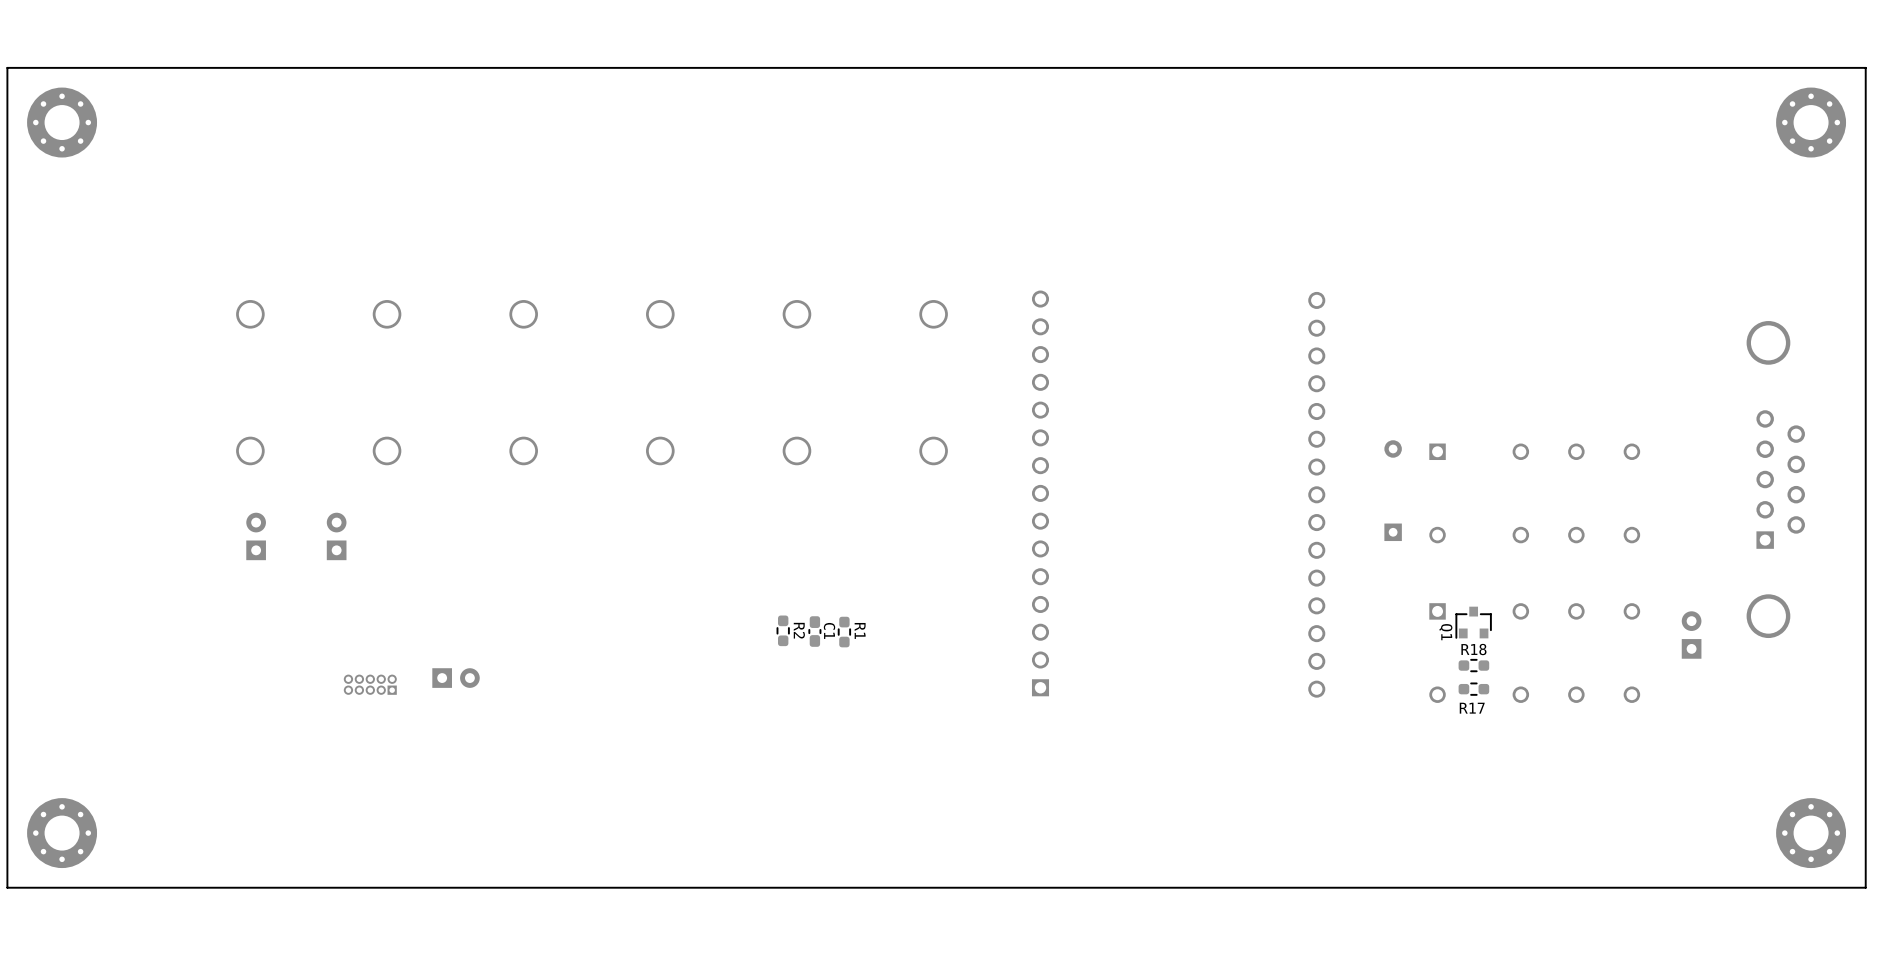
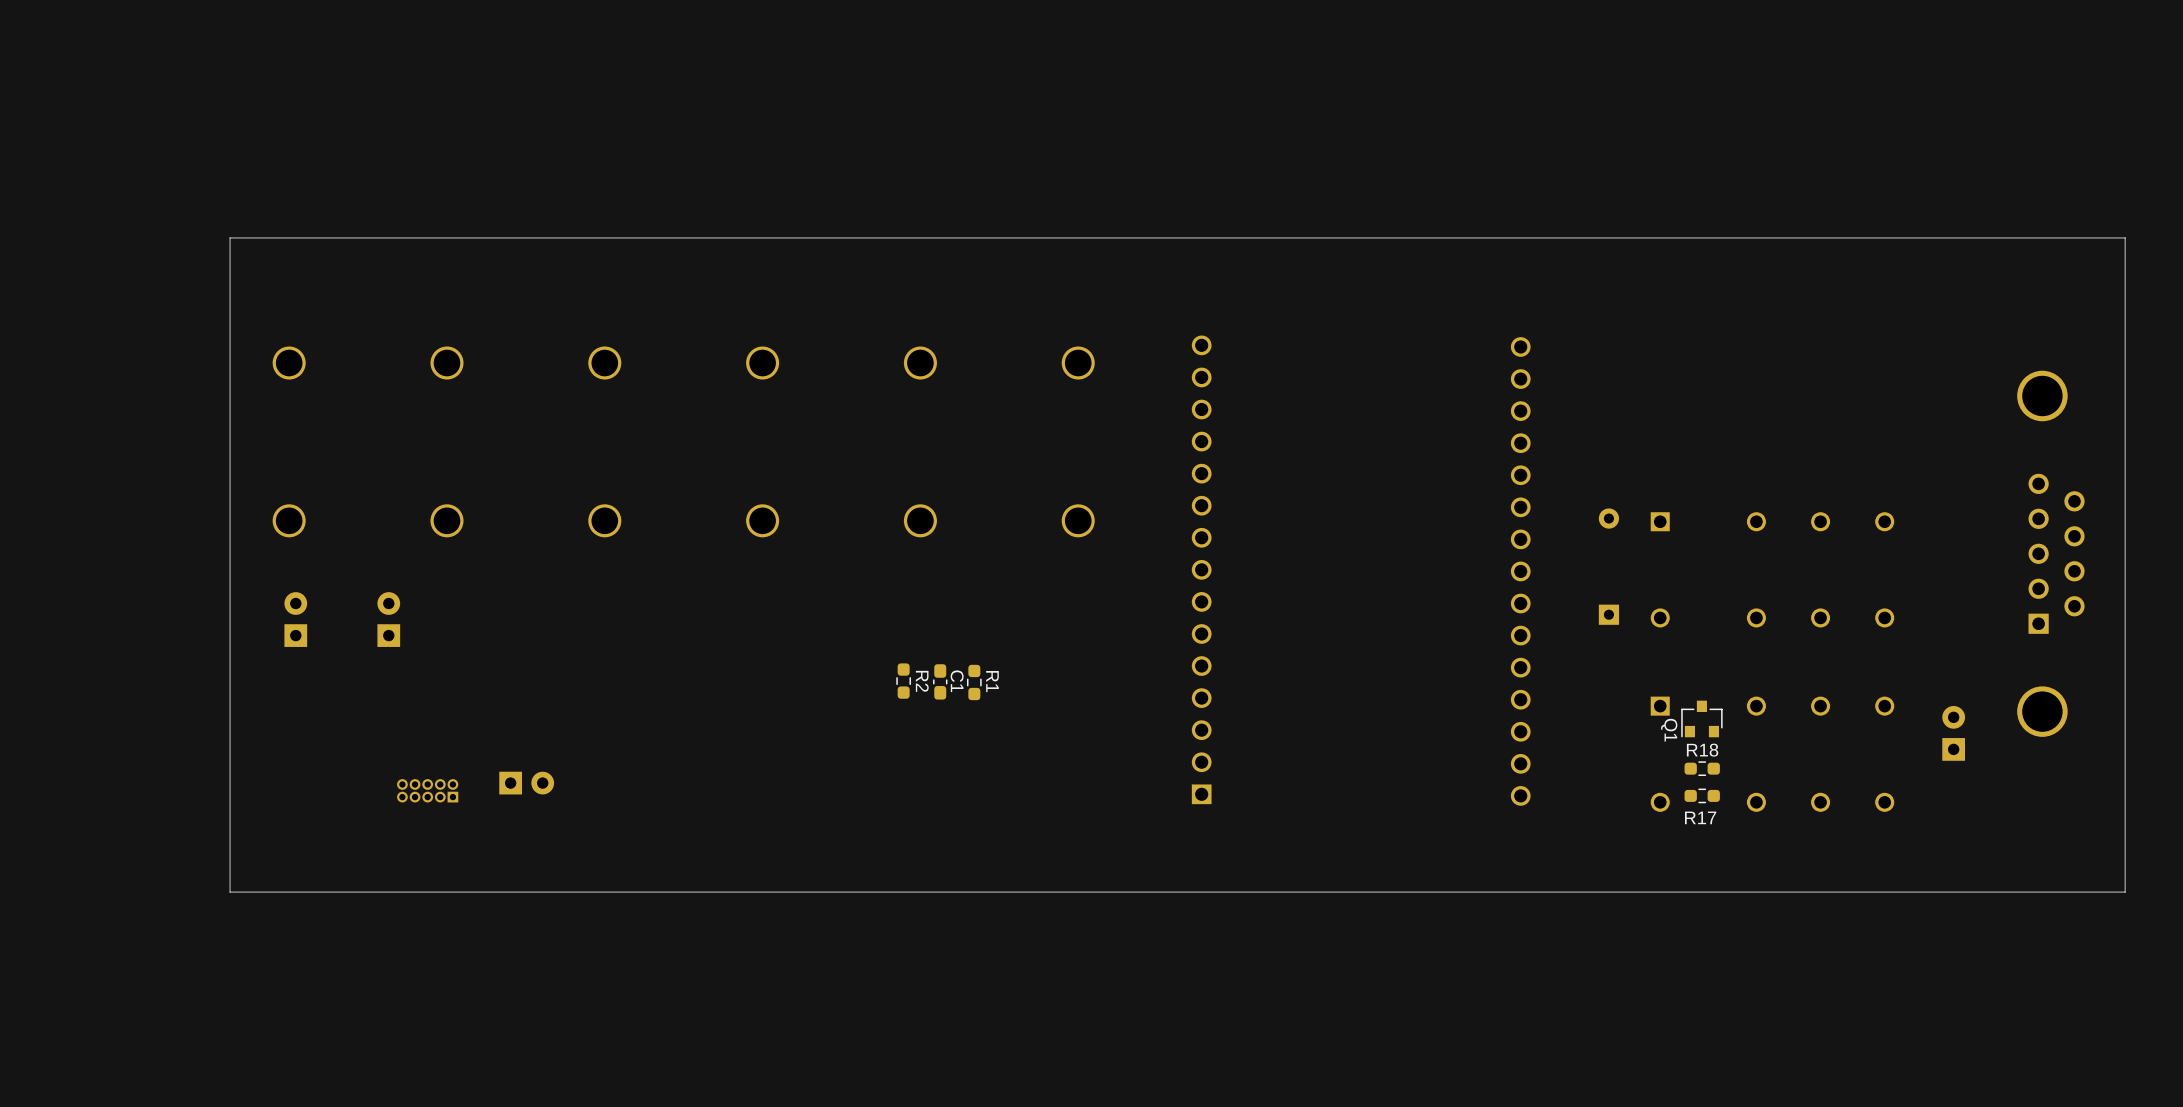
board edge: (1865, 67) (7, 67) (7, 887) (1865, 887) (1865, 67) -> (2125, 237) (2125, 892) (230, 892) (230, 237) (2125, 237)
part: (62, 122) -> none
part: (1811, 122) -> none
R2 position: (783, 630) -> (903, 681)
C1 position: (814, 631) -> (940, 681)
R1 position: (844, 632) -> (974, 682)
part: (62, 833) -> none
part: (1811, 833) -> none

